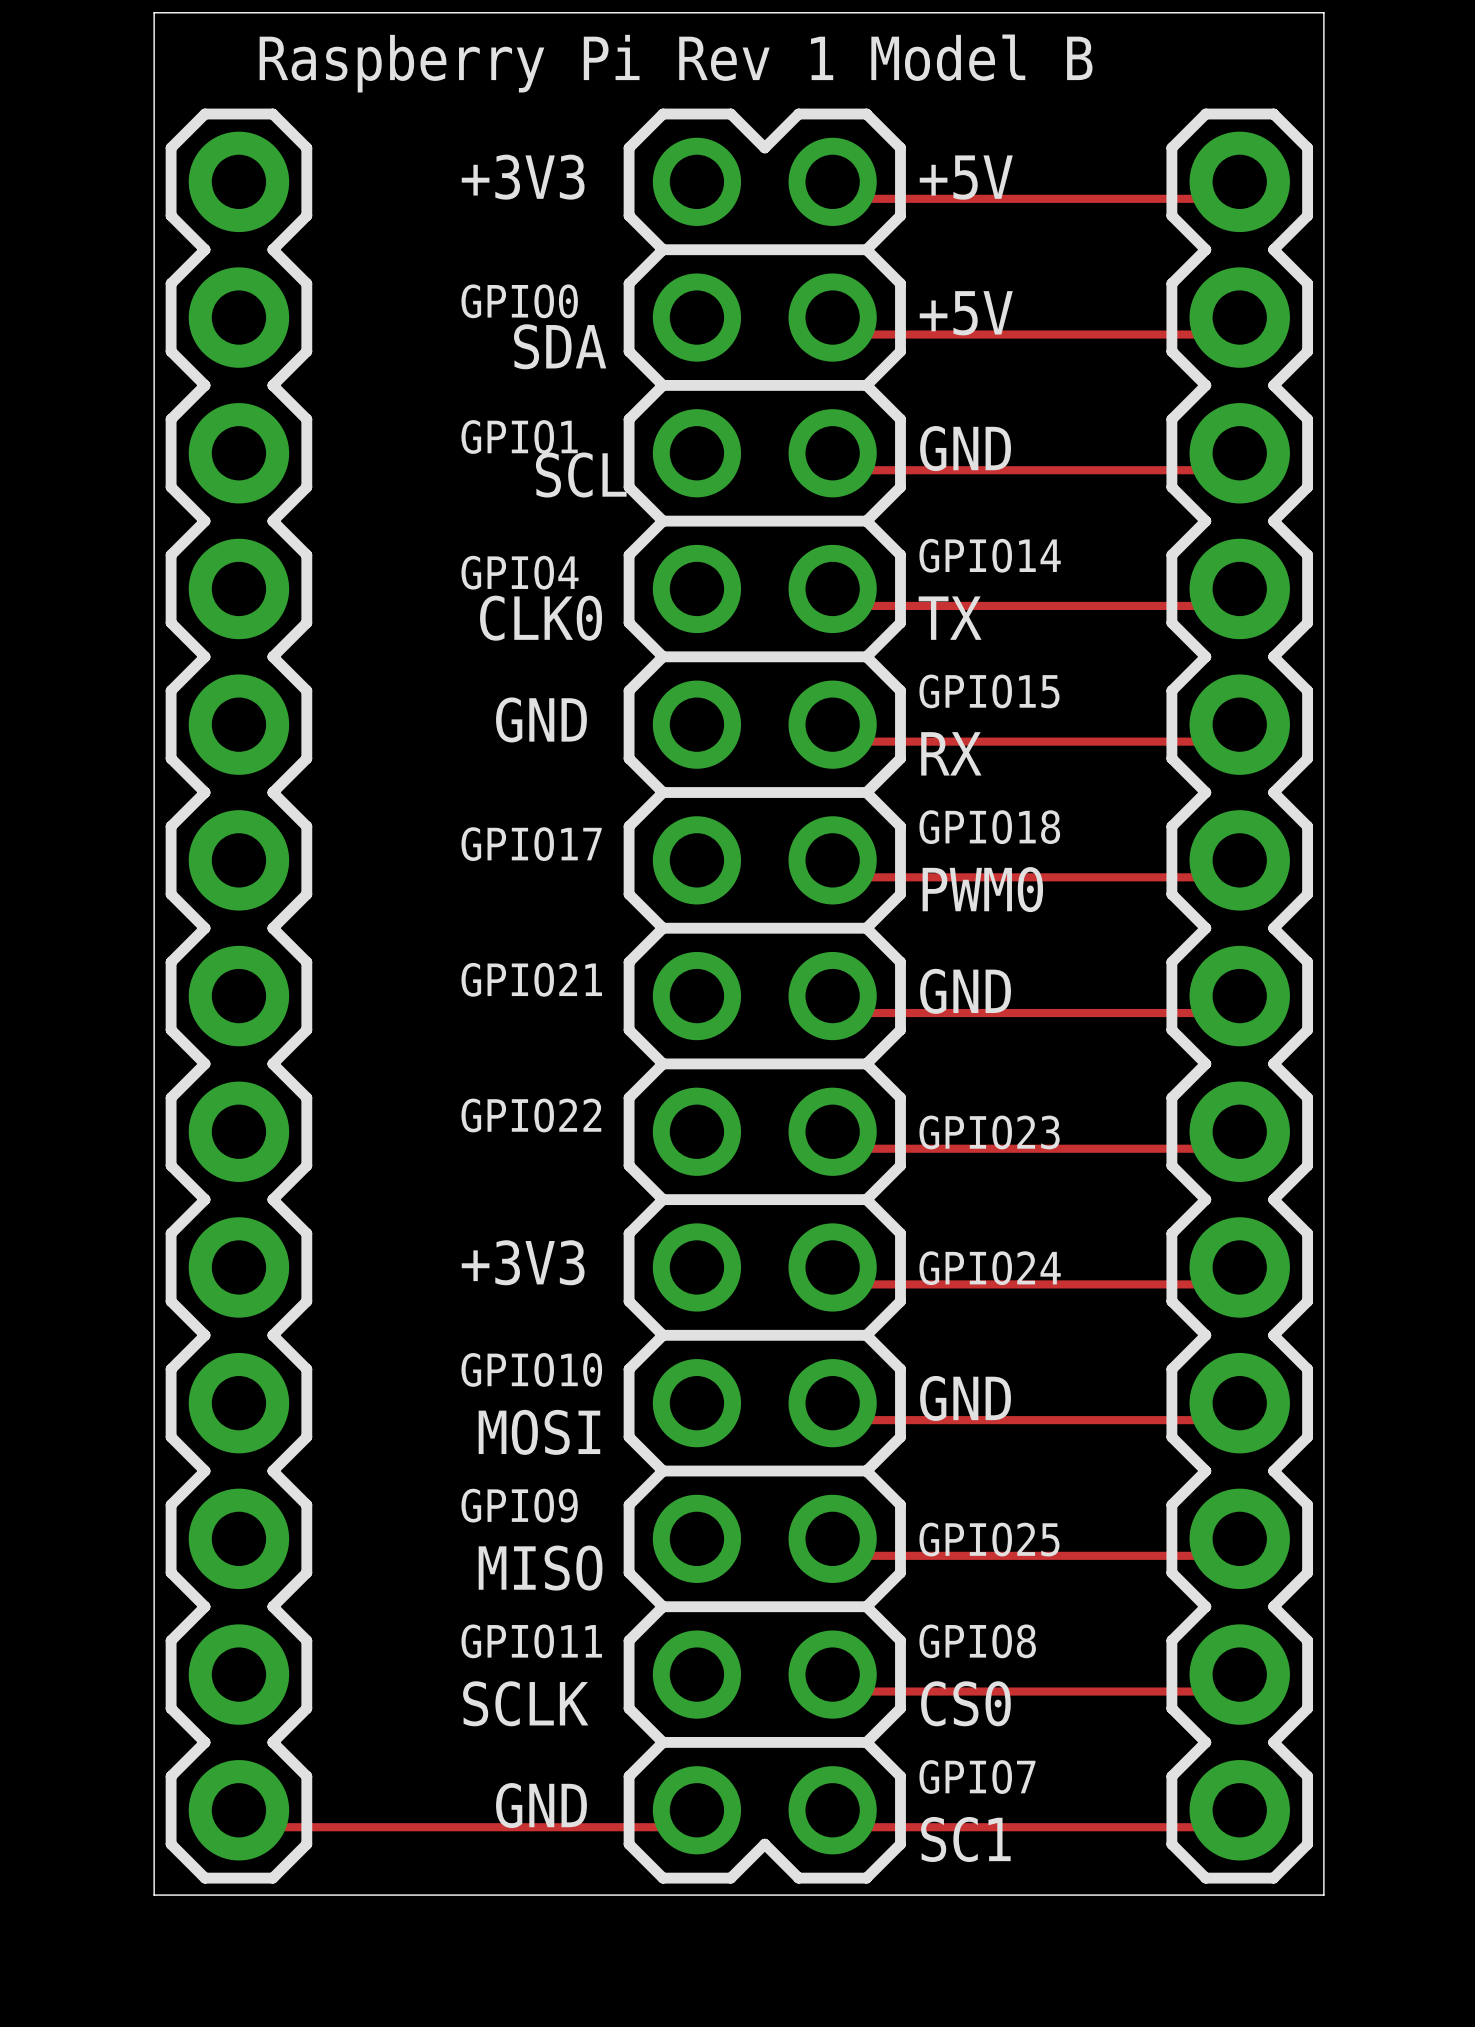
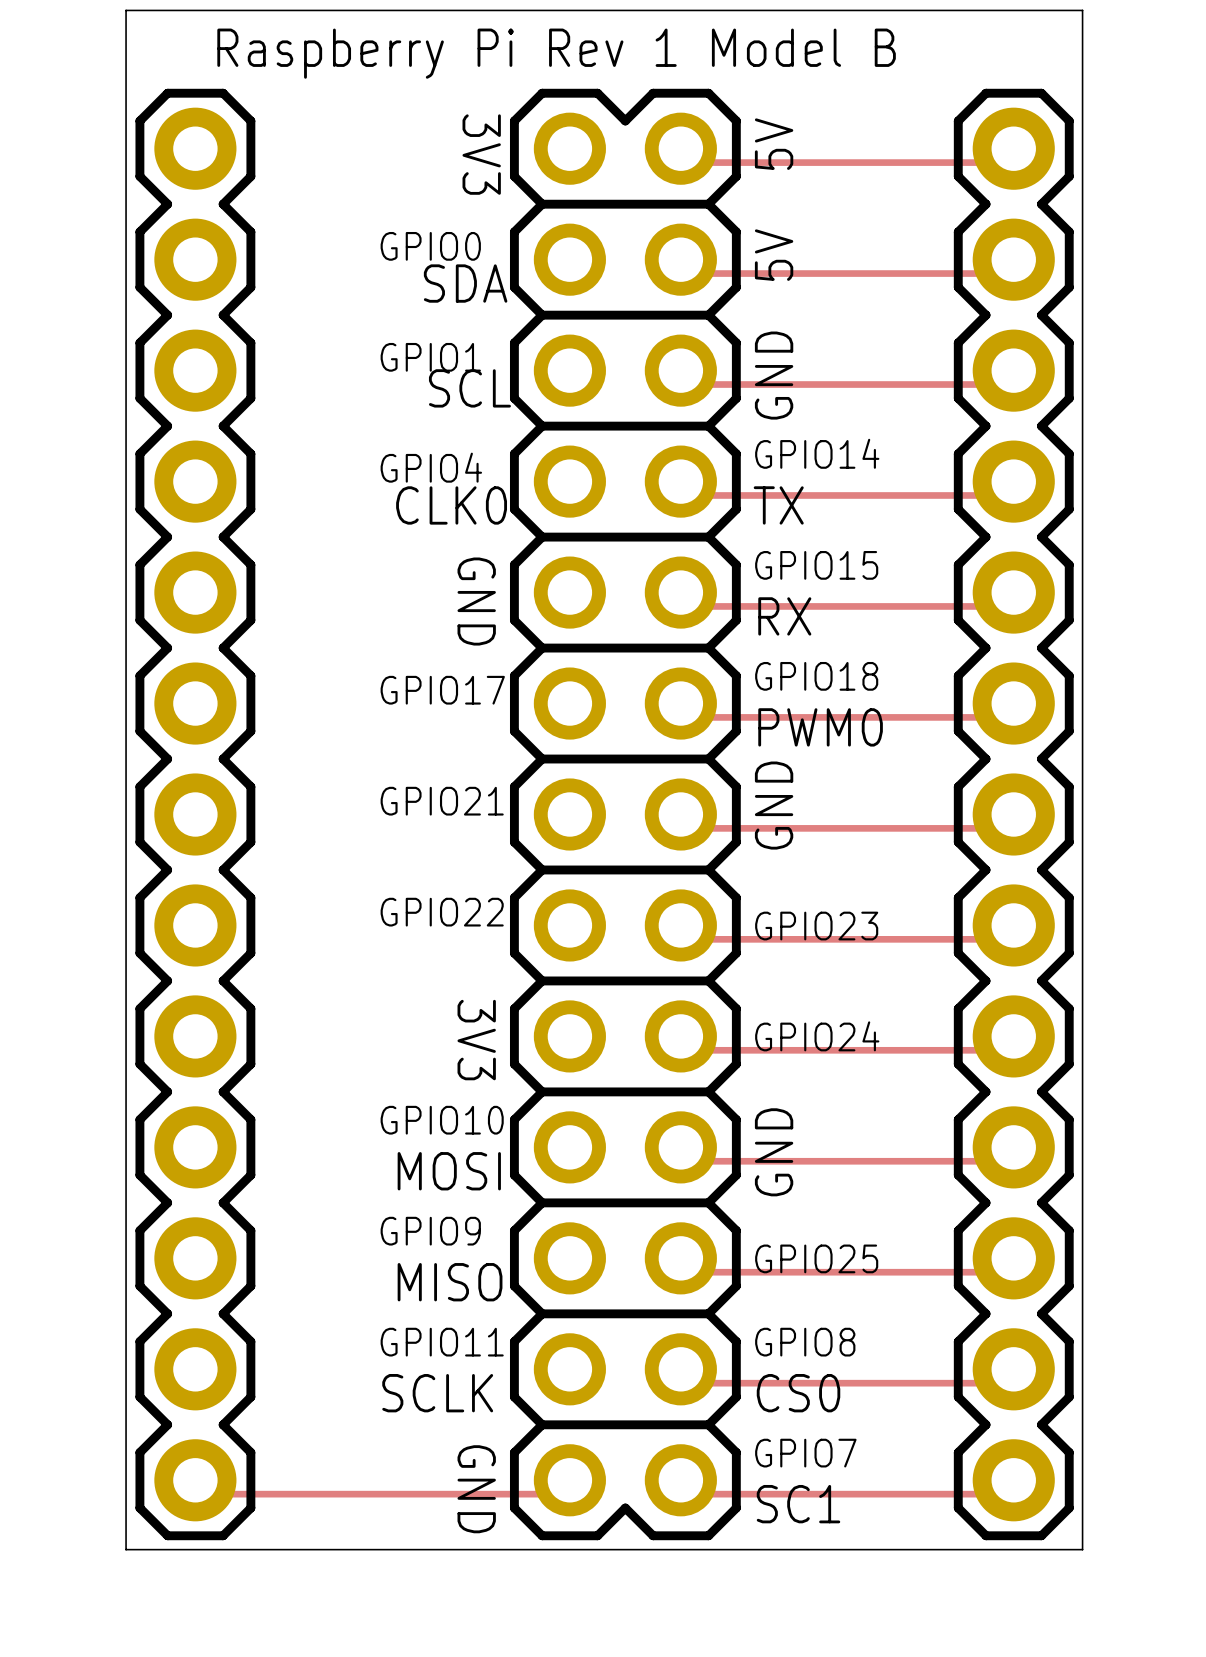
text: +3V3 (523, 177) -> 3V3 (481, 154)
text: +5V (966, 177) -> 5V (774, 144)
text: +5V (966, 313) -> 5V (774, 255)
text rotation: 0° (965, 448) -> 90° counterclockwise (774, 375)
text rotation: 0° (541, 719) -> 90° clockwise (476, 601)
text rotation: 0° (965, 991) -> 90° counterclockwise (774, 805)
text: +3V3 (523, 1262) -> 3V3 (476, 1040)
text rotation: 0° (965, 1398) -> 90° counterclockwise (774, 1152)
text rotation: 0° (541, 1805) -> 90° clockwise (476, 1489)

